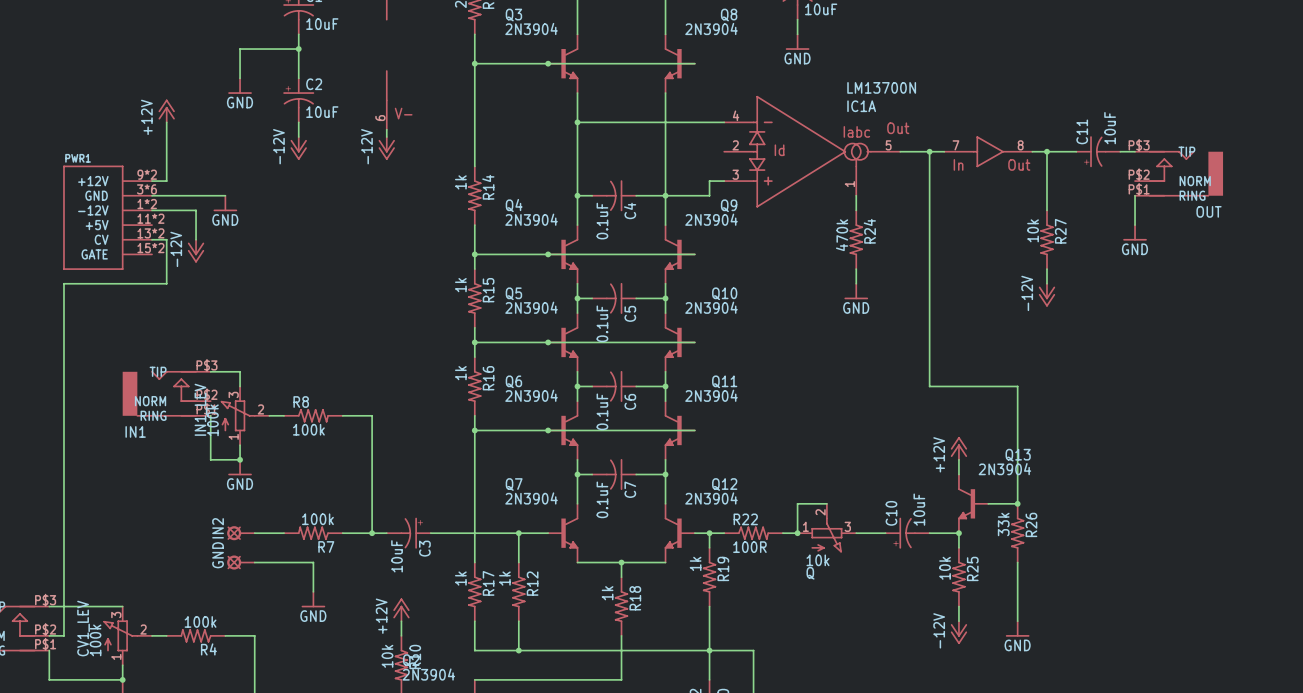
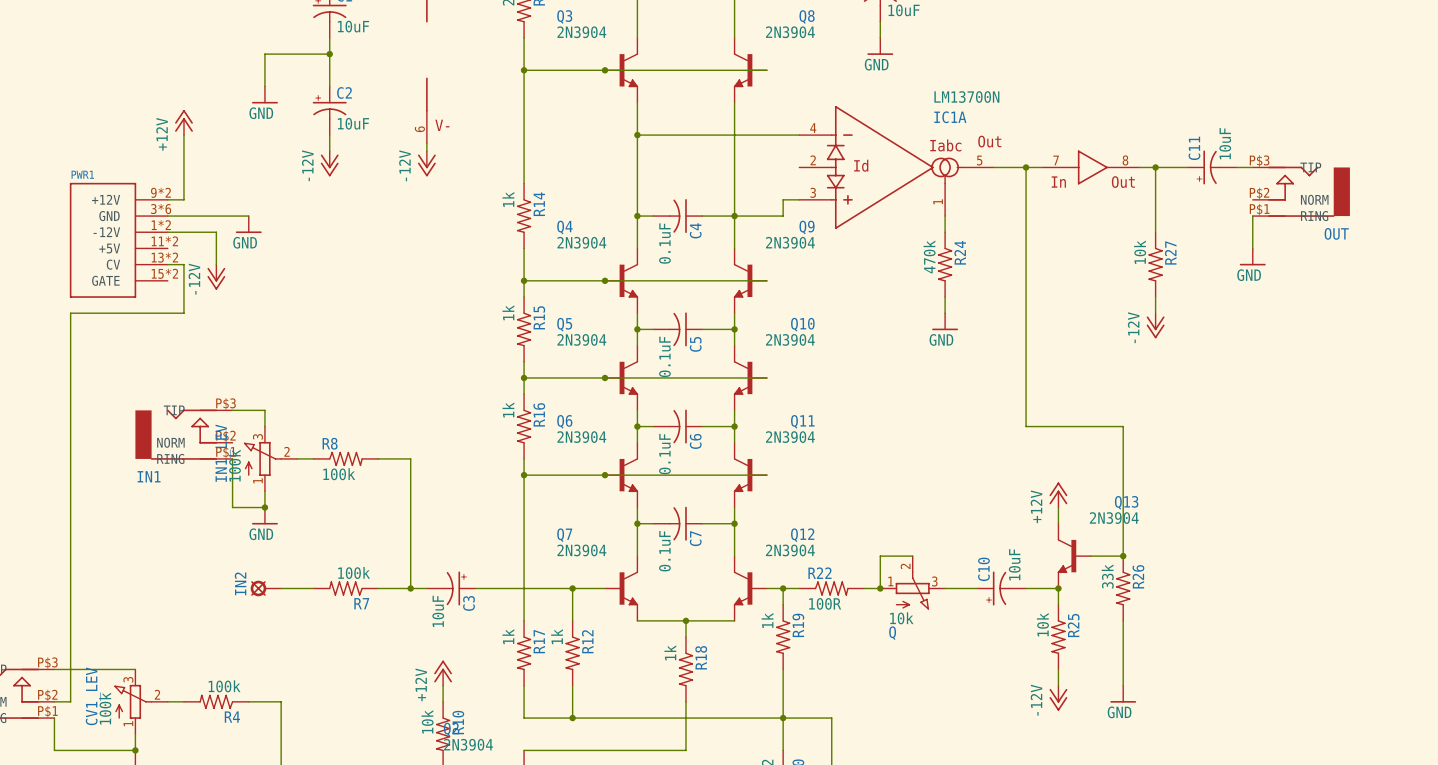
GND: (240, 562) -> none
wire: (254, 562) (313, 562) (313, 591) -> none
power symbol: GND (313, 599) -> none

